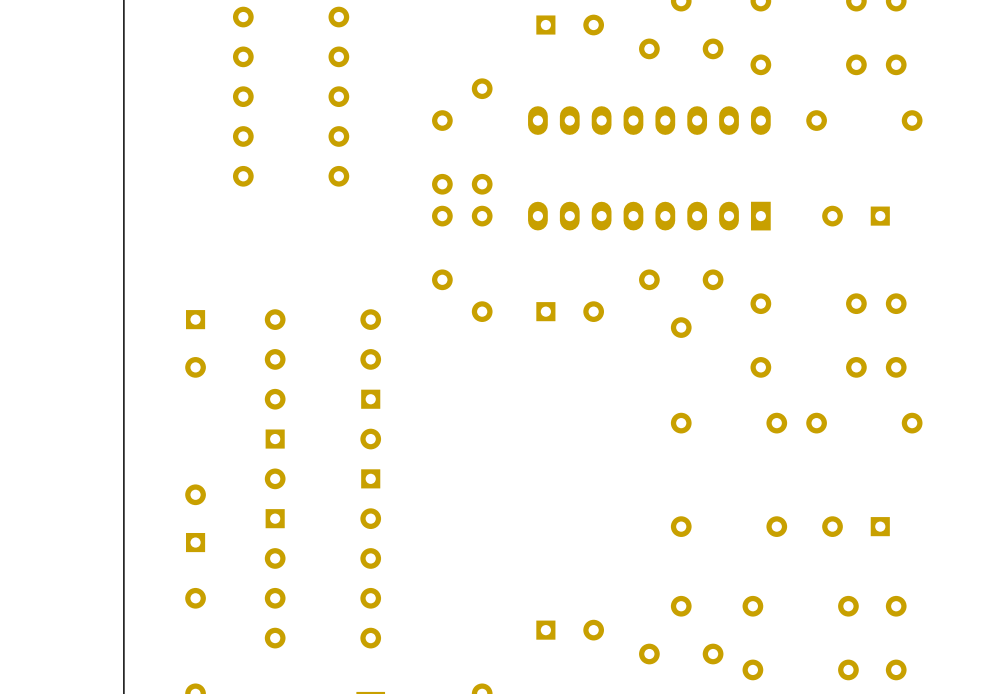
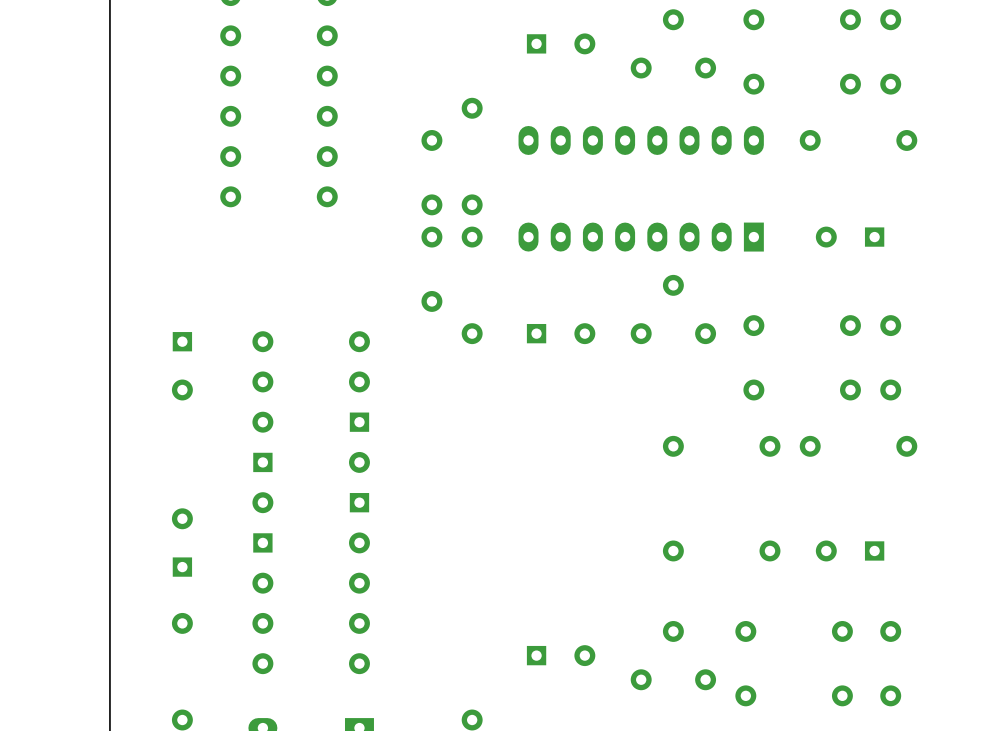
part rotation: 0° (681, 303) -> 180° (673, 309)

